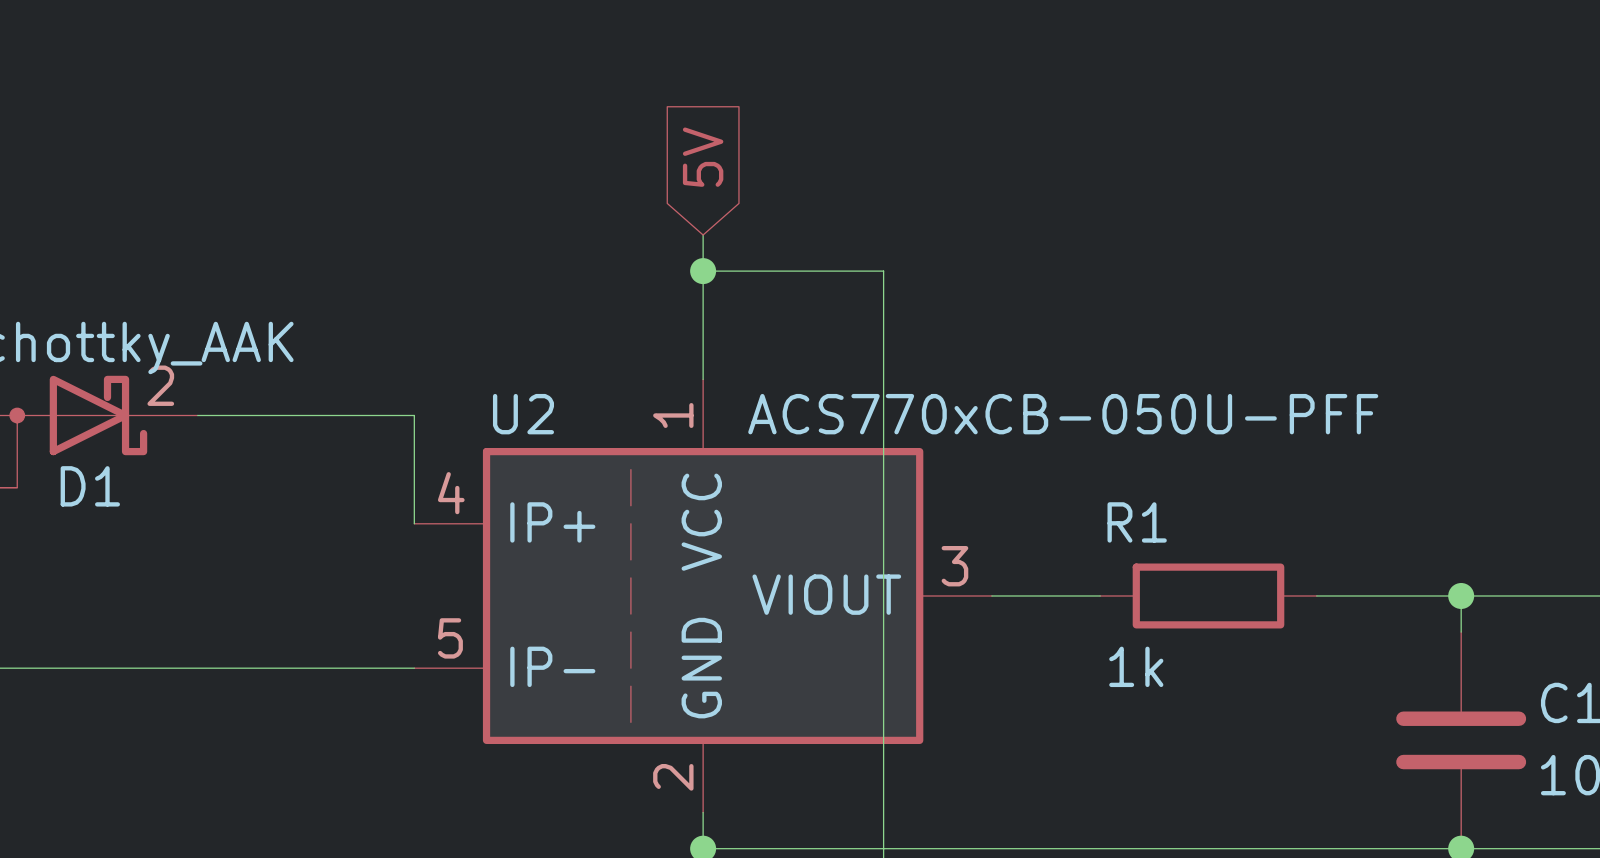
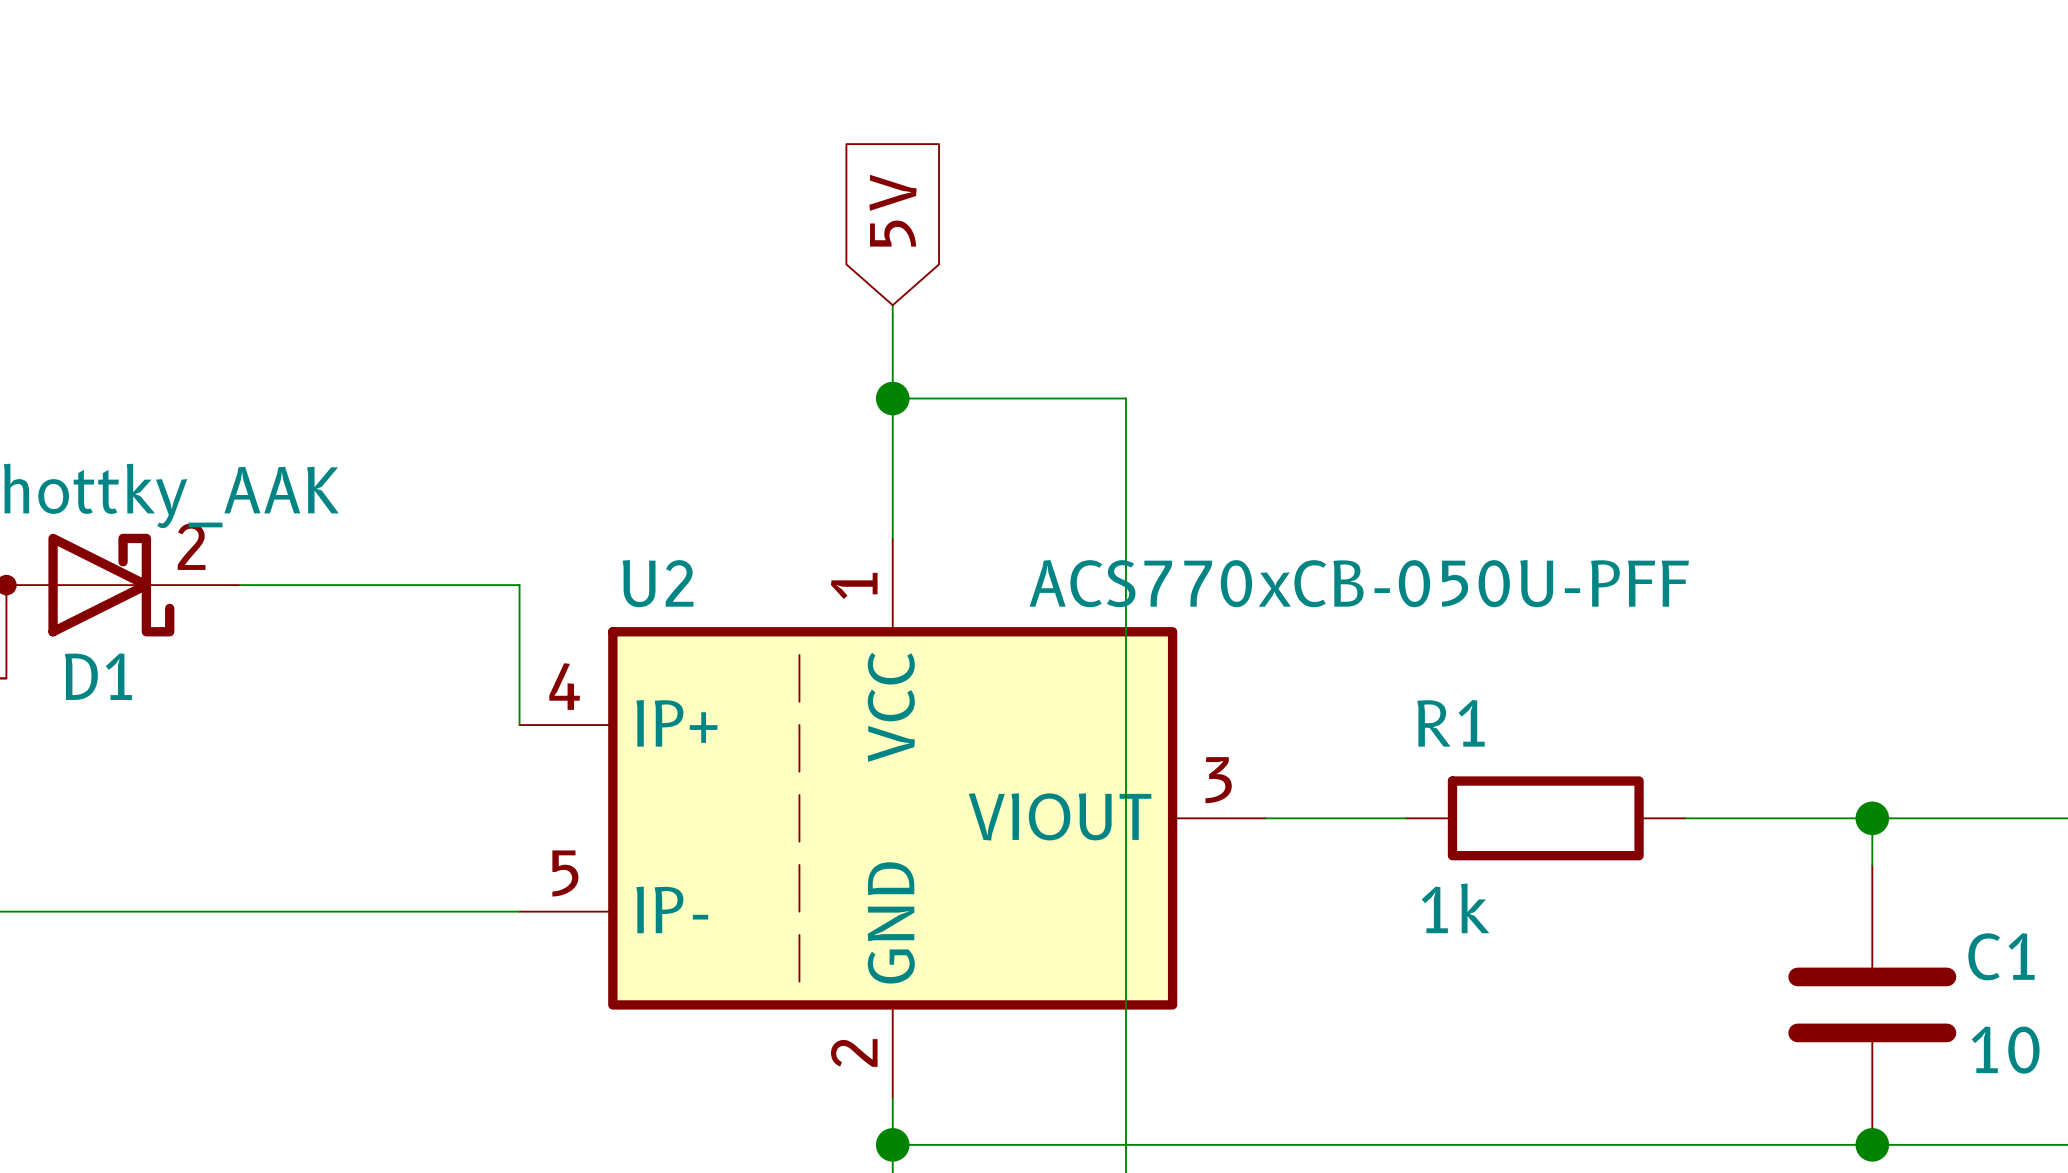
global label position: 5V (703, 157) -> 5V (893, 210)
wire: none -> (892, 305) (892, 351)

